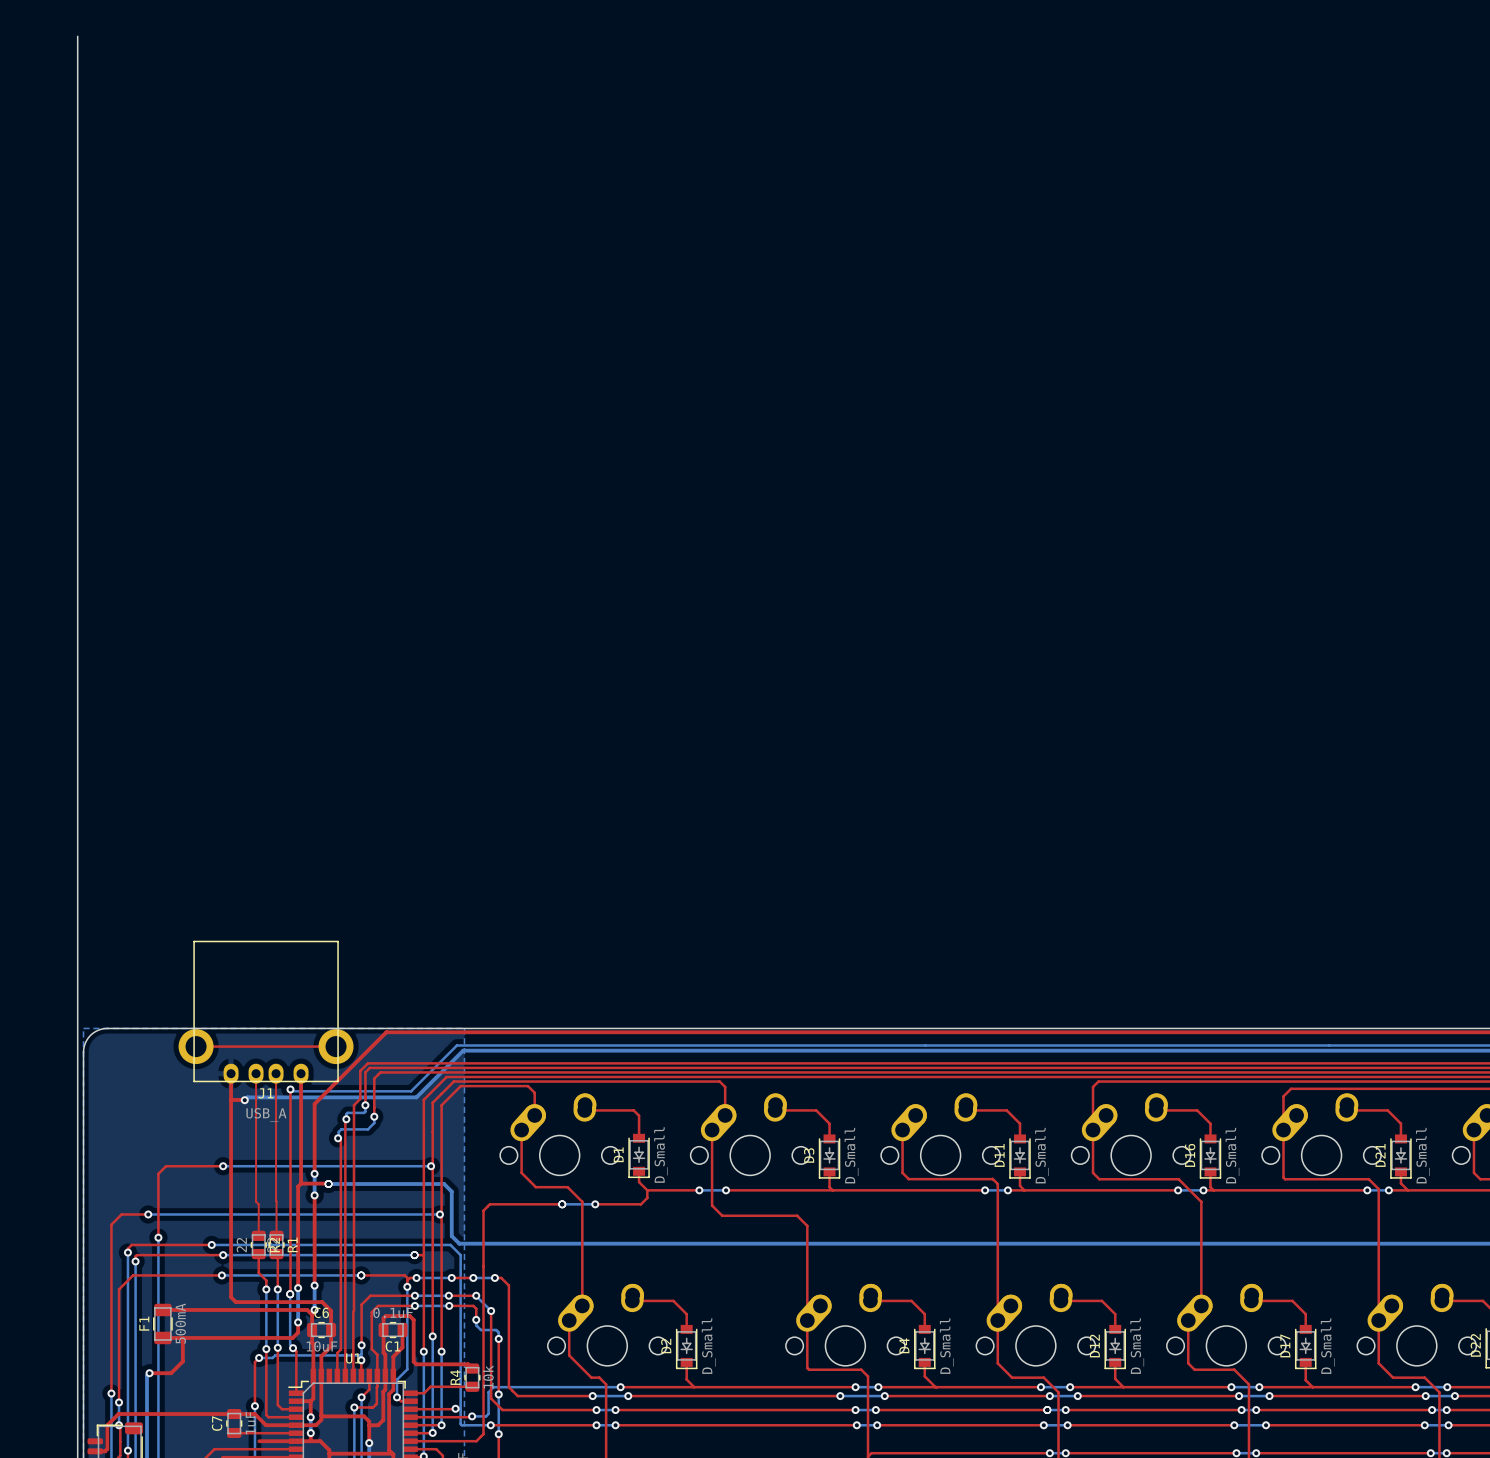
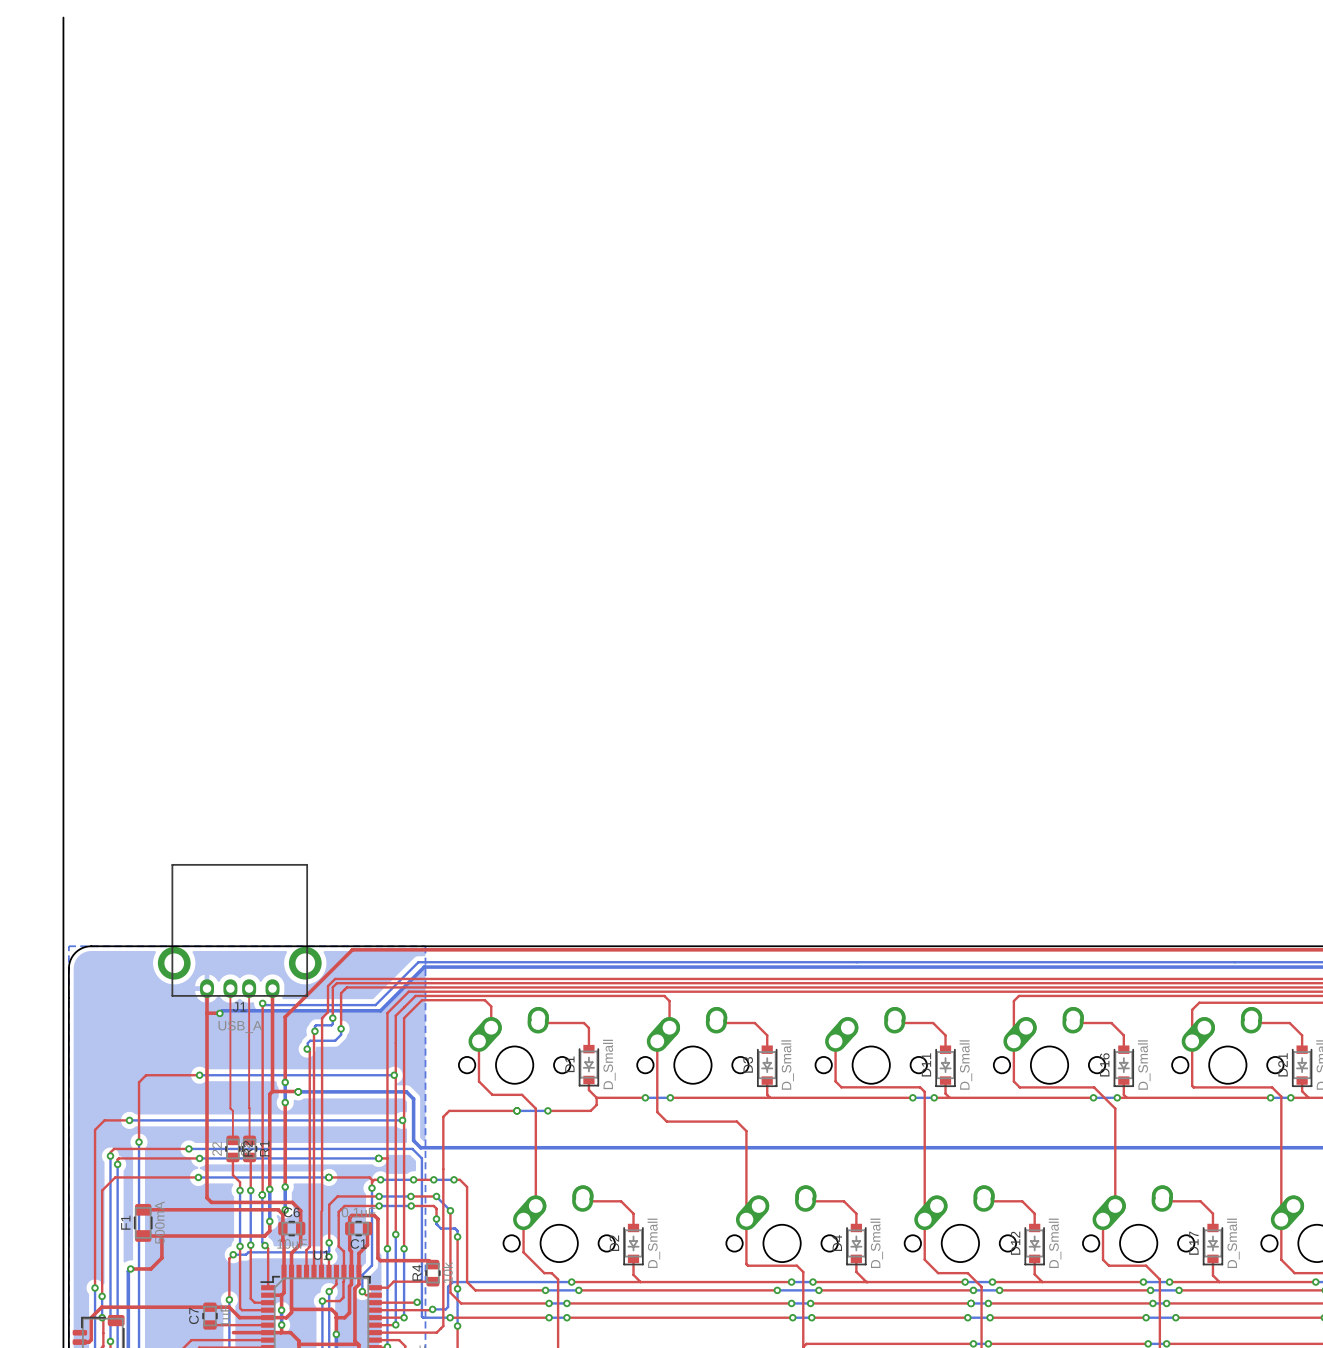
top track: (196, 1046) (336, 1046) -> none

